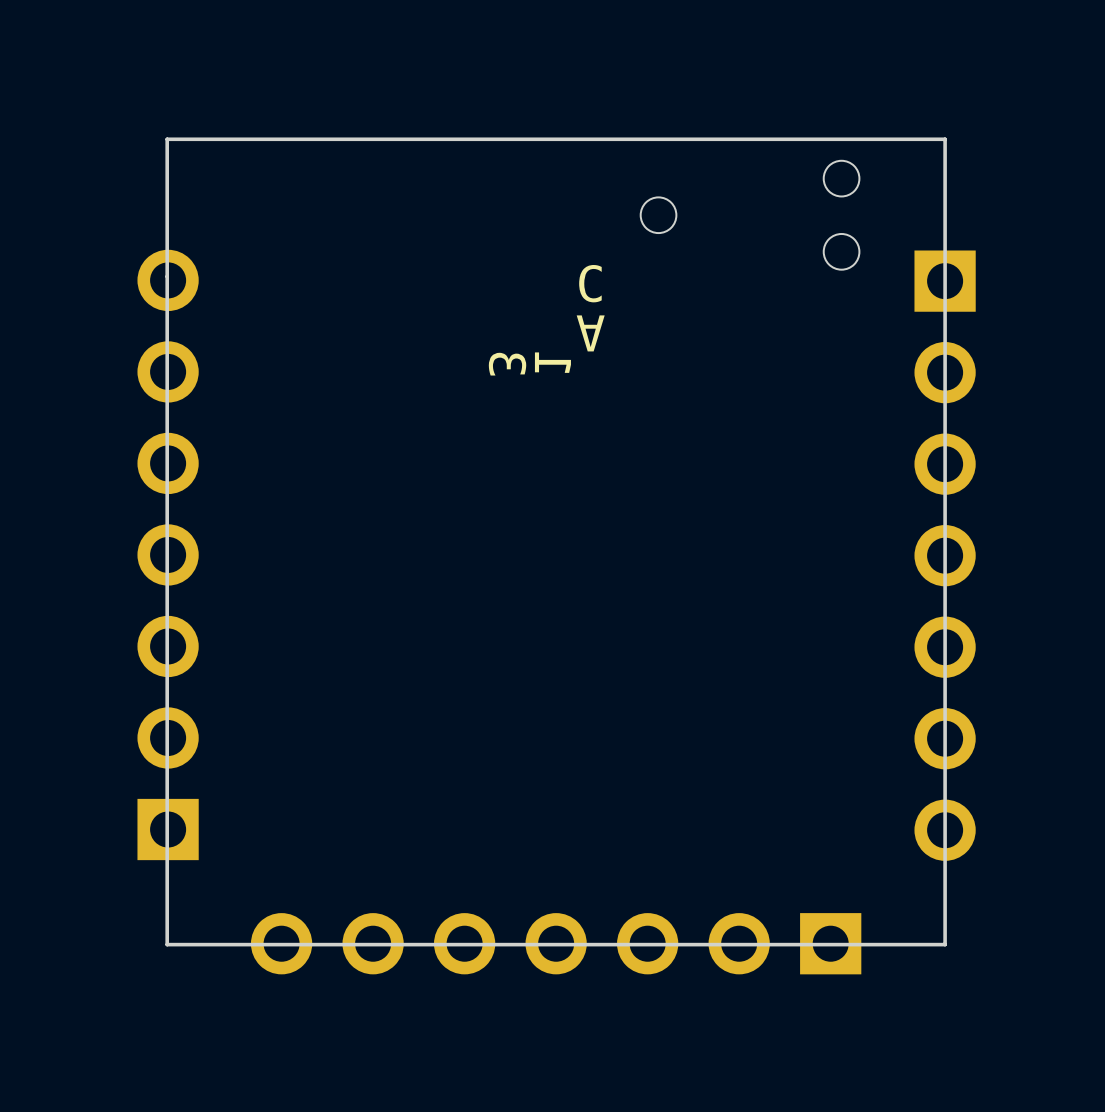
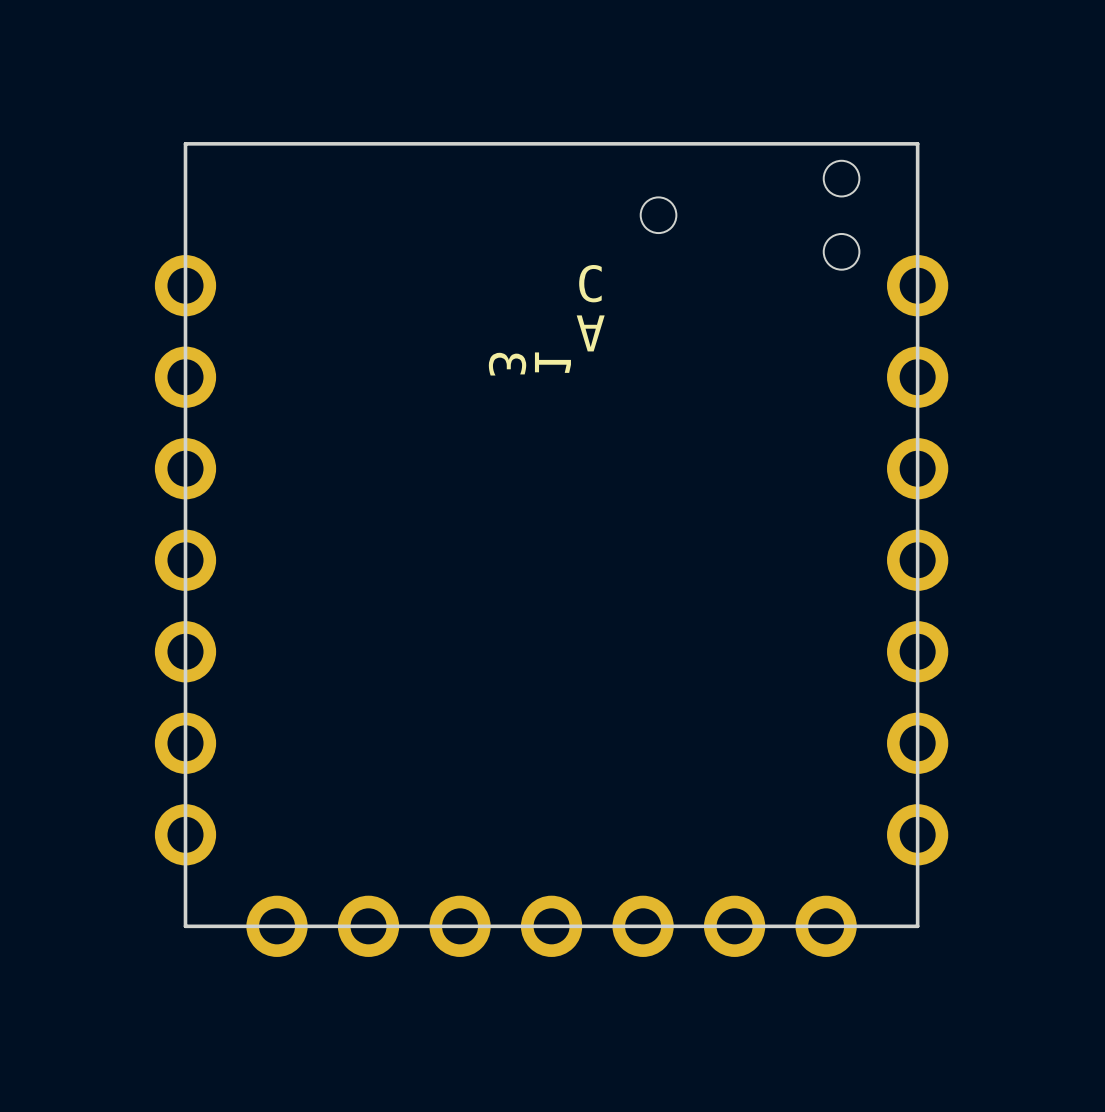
board edge: (945, 139) (167, 139) (167, 944) (945, 944) (945, 139) -> (917, 143) (917, 926) (185, 926) (185, 143) (917, 143)
part: (168, 554) -> none
part: (945, 555) -> none
part: none -> (551, 606)
part: (556, 943) -> none

